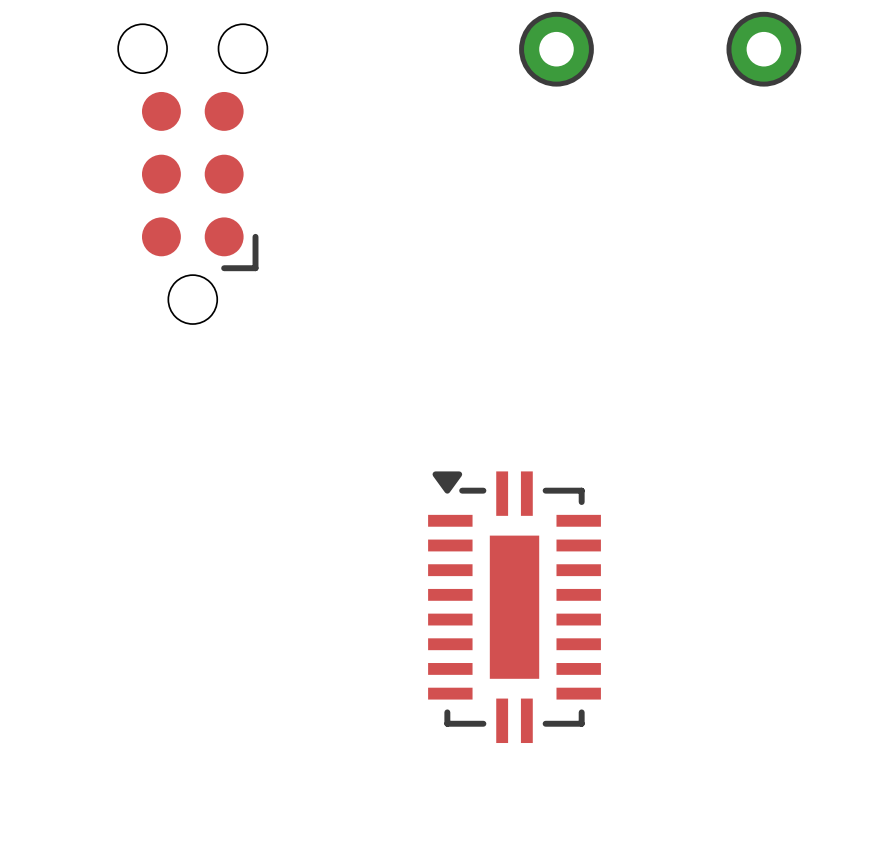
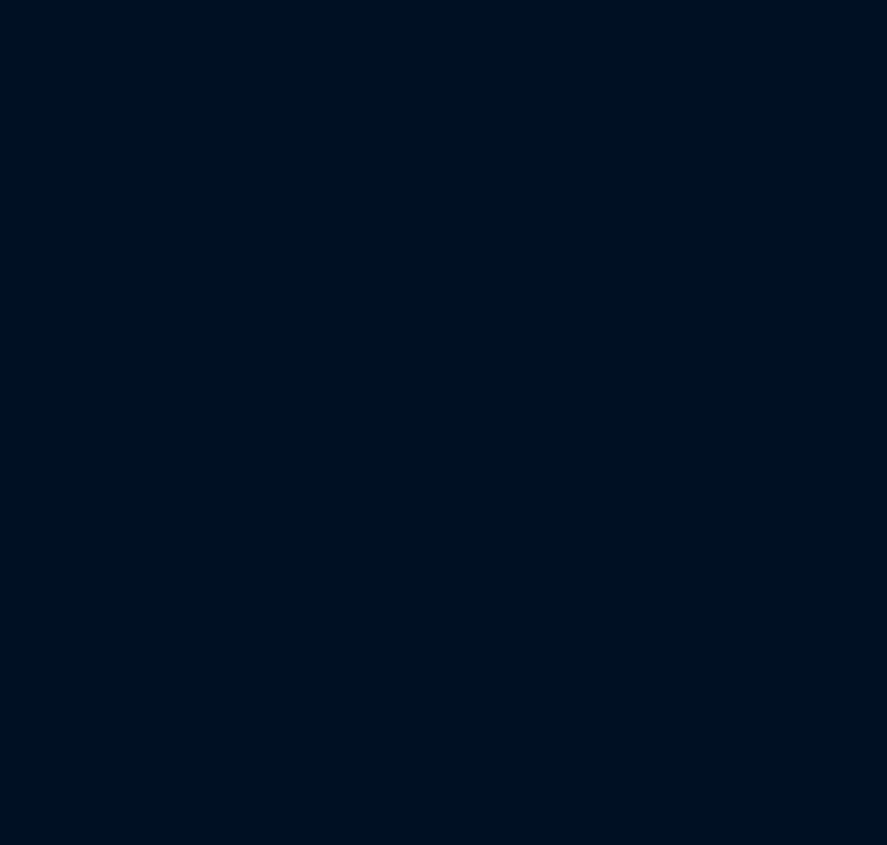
part: (556, 49) -> none
part: (763, 49) -> none
part: (192, 174) -> none
part: (514, 607) -> none

